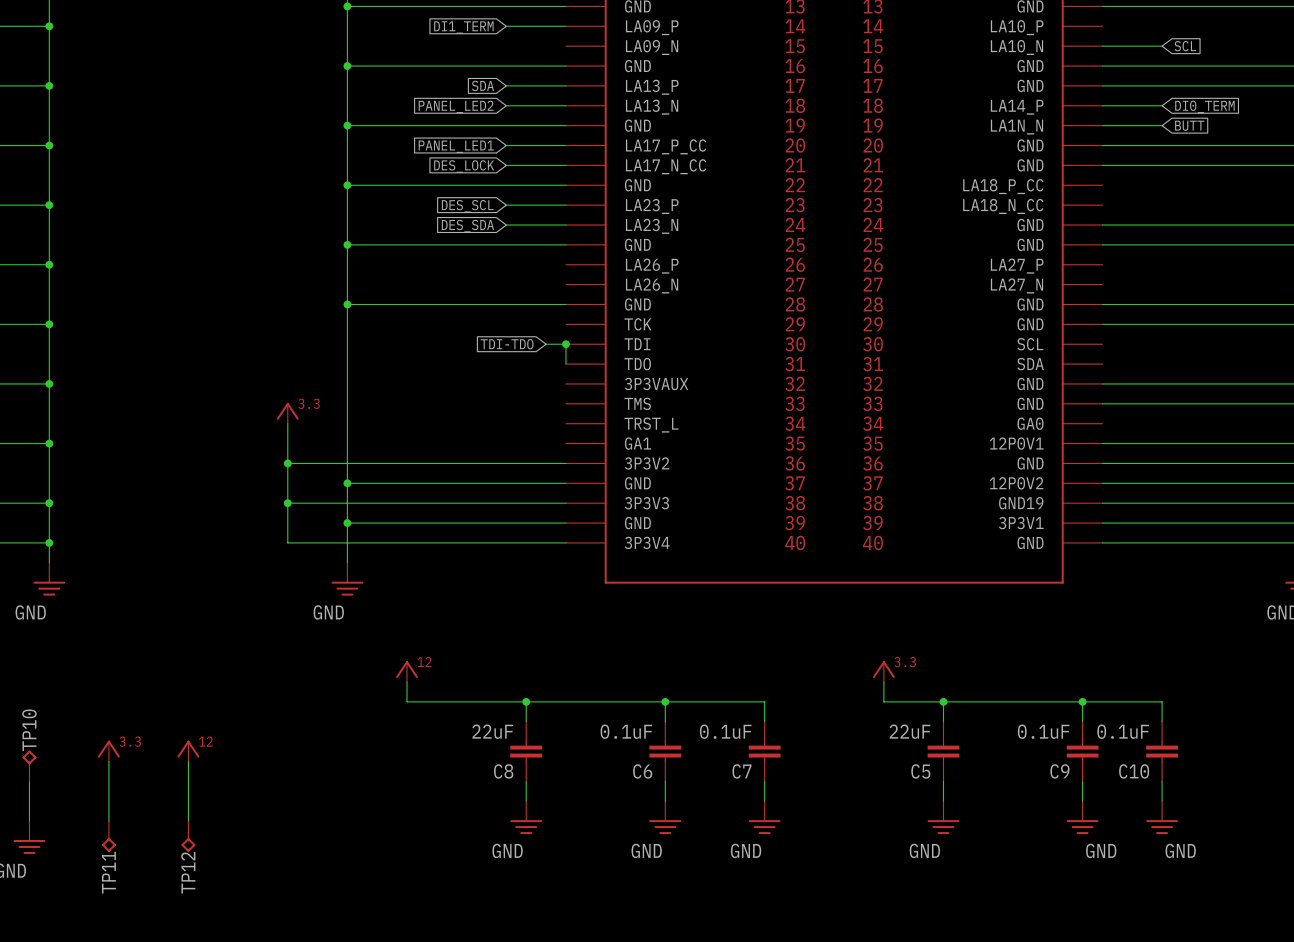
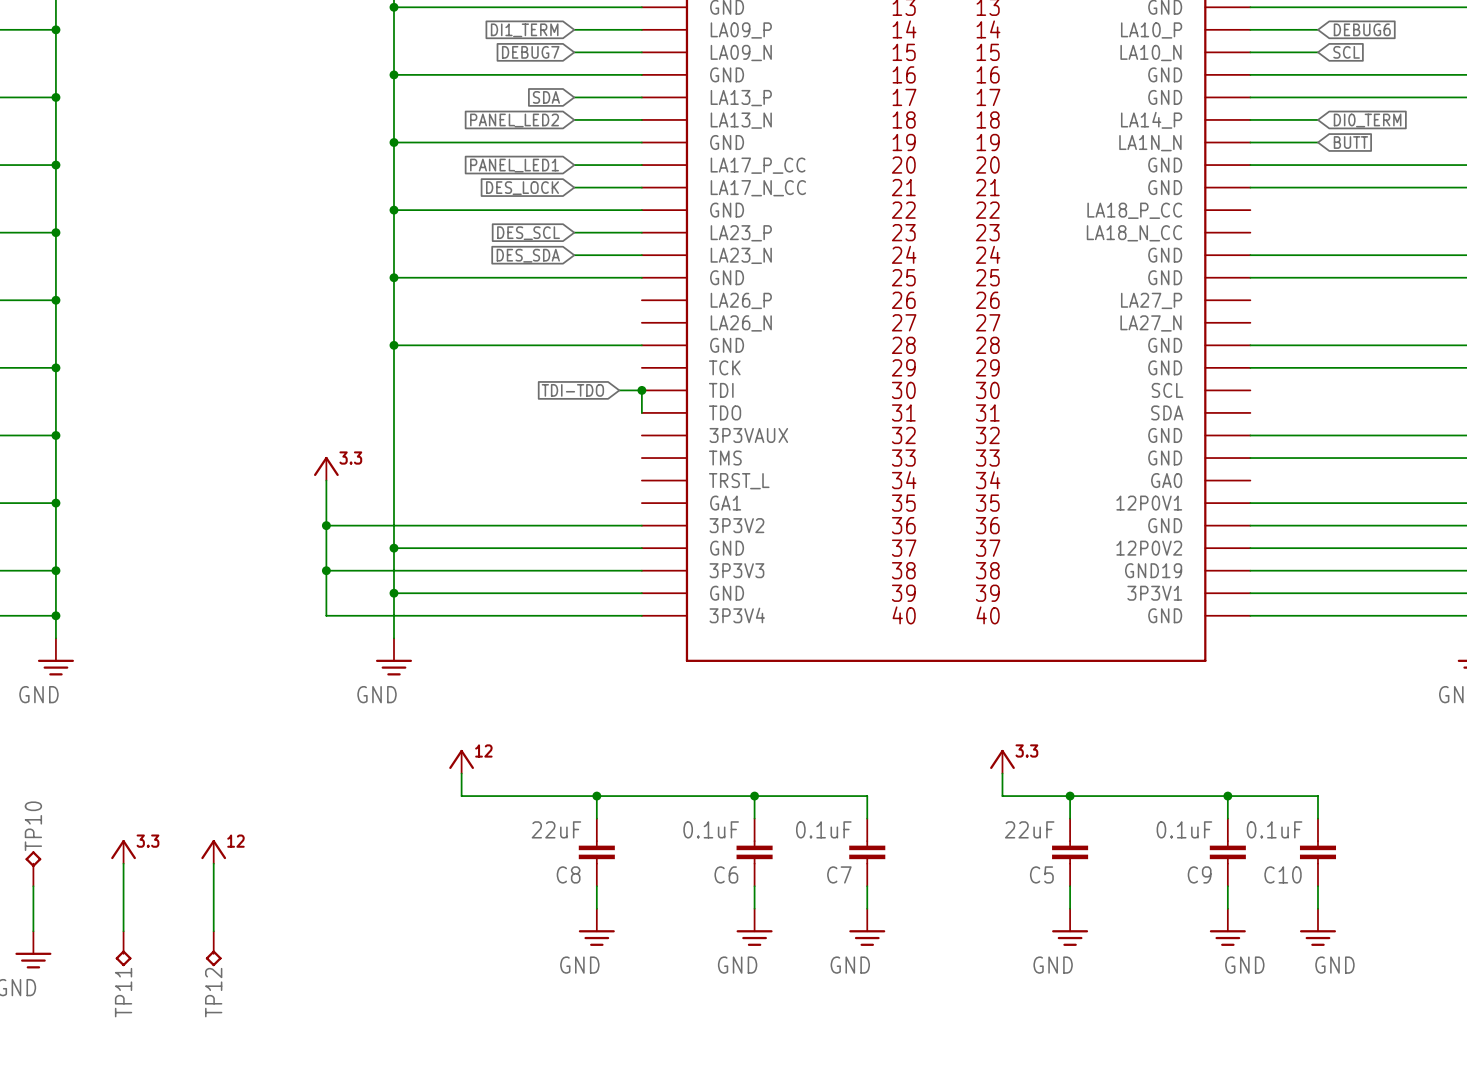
wire: none -> (1250, 29) (1317, 29)
global label: none -> DEBUG6 (1362, 29)
global label: none -> DEBUG7 (530, 52)
wire: none -> (574, 52) (641, 52)

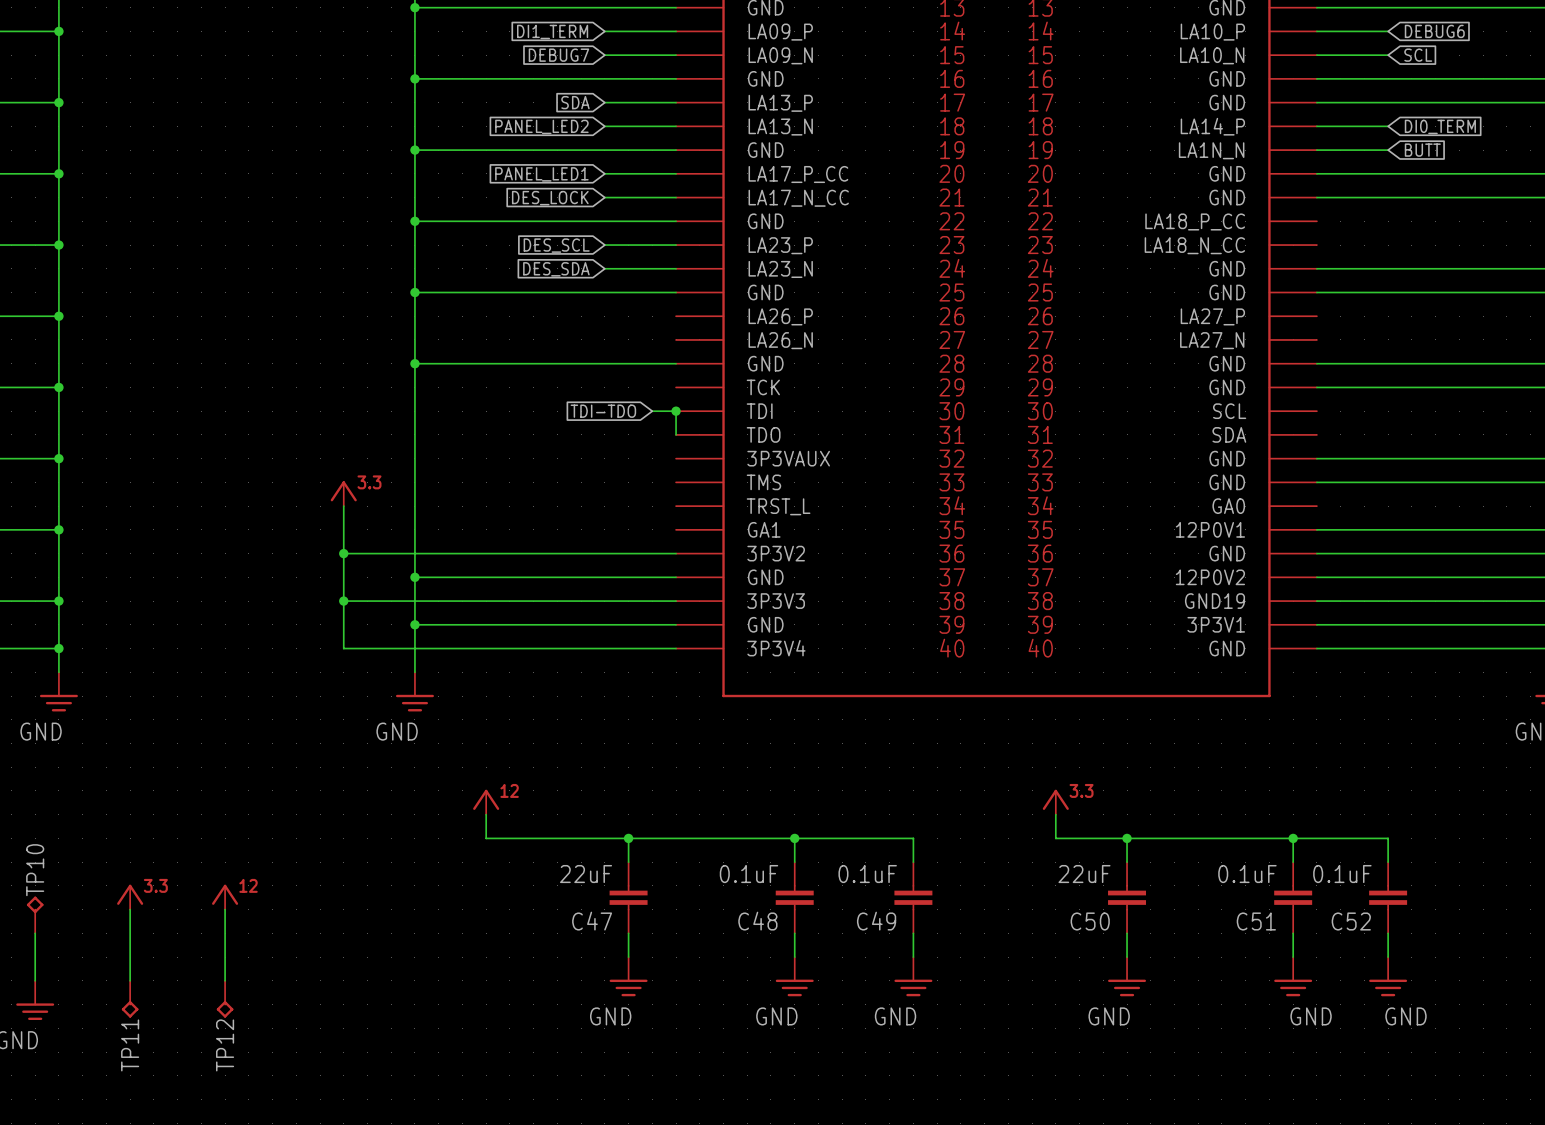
C8 name: C8 (568, 874) -> C47 (592, 921)
C6 name: C6 (726, 874) -> C48 (757, 921)
C7 name: C7 (839, 874) -> C49 (876, 921)
C5 name: C5 (1041, 874) -> C50 (1090, 921)
C9 name: C9 (1199, 874) -> C51 (1256, 921)
C10 name: C10 (1283, 874) -> C52 (1351, 921)

